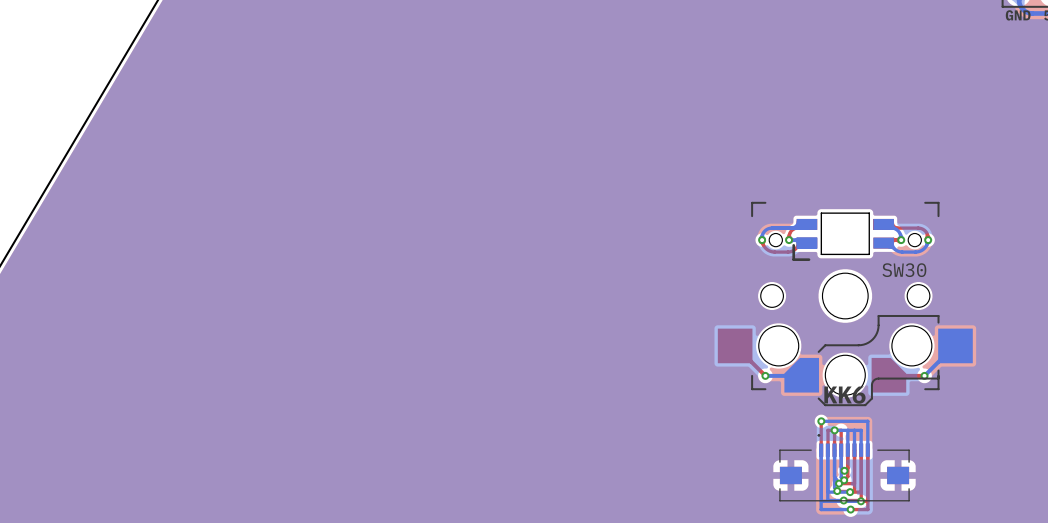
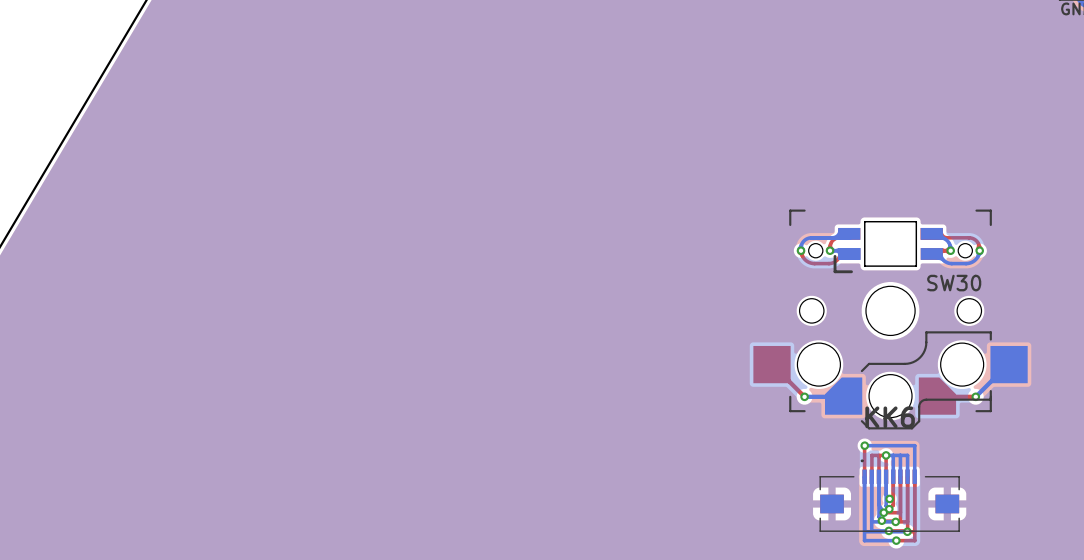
KK6 footprint: [779, 417, 910, 506] -> [819, 441, 960, 537]

